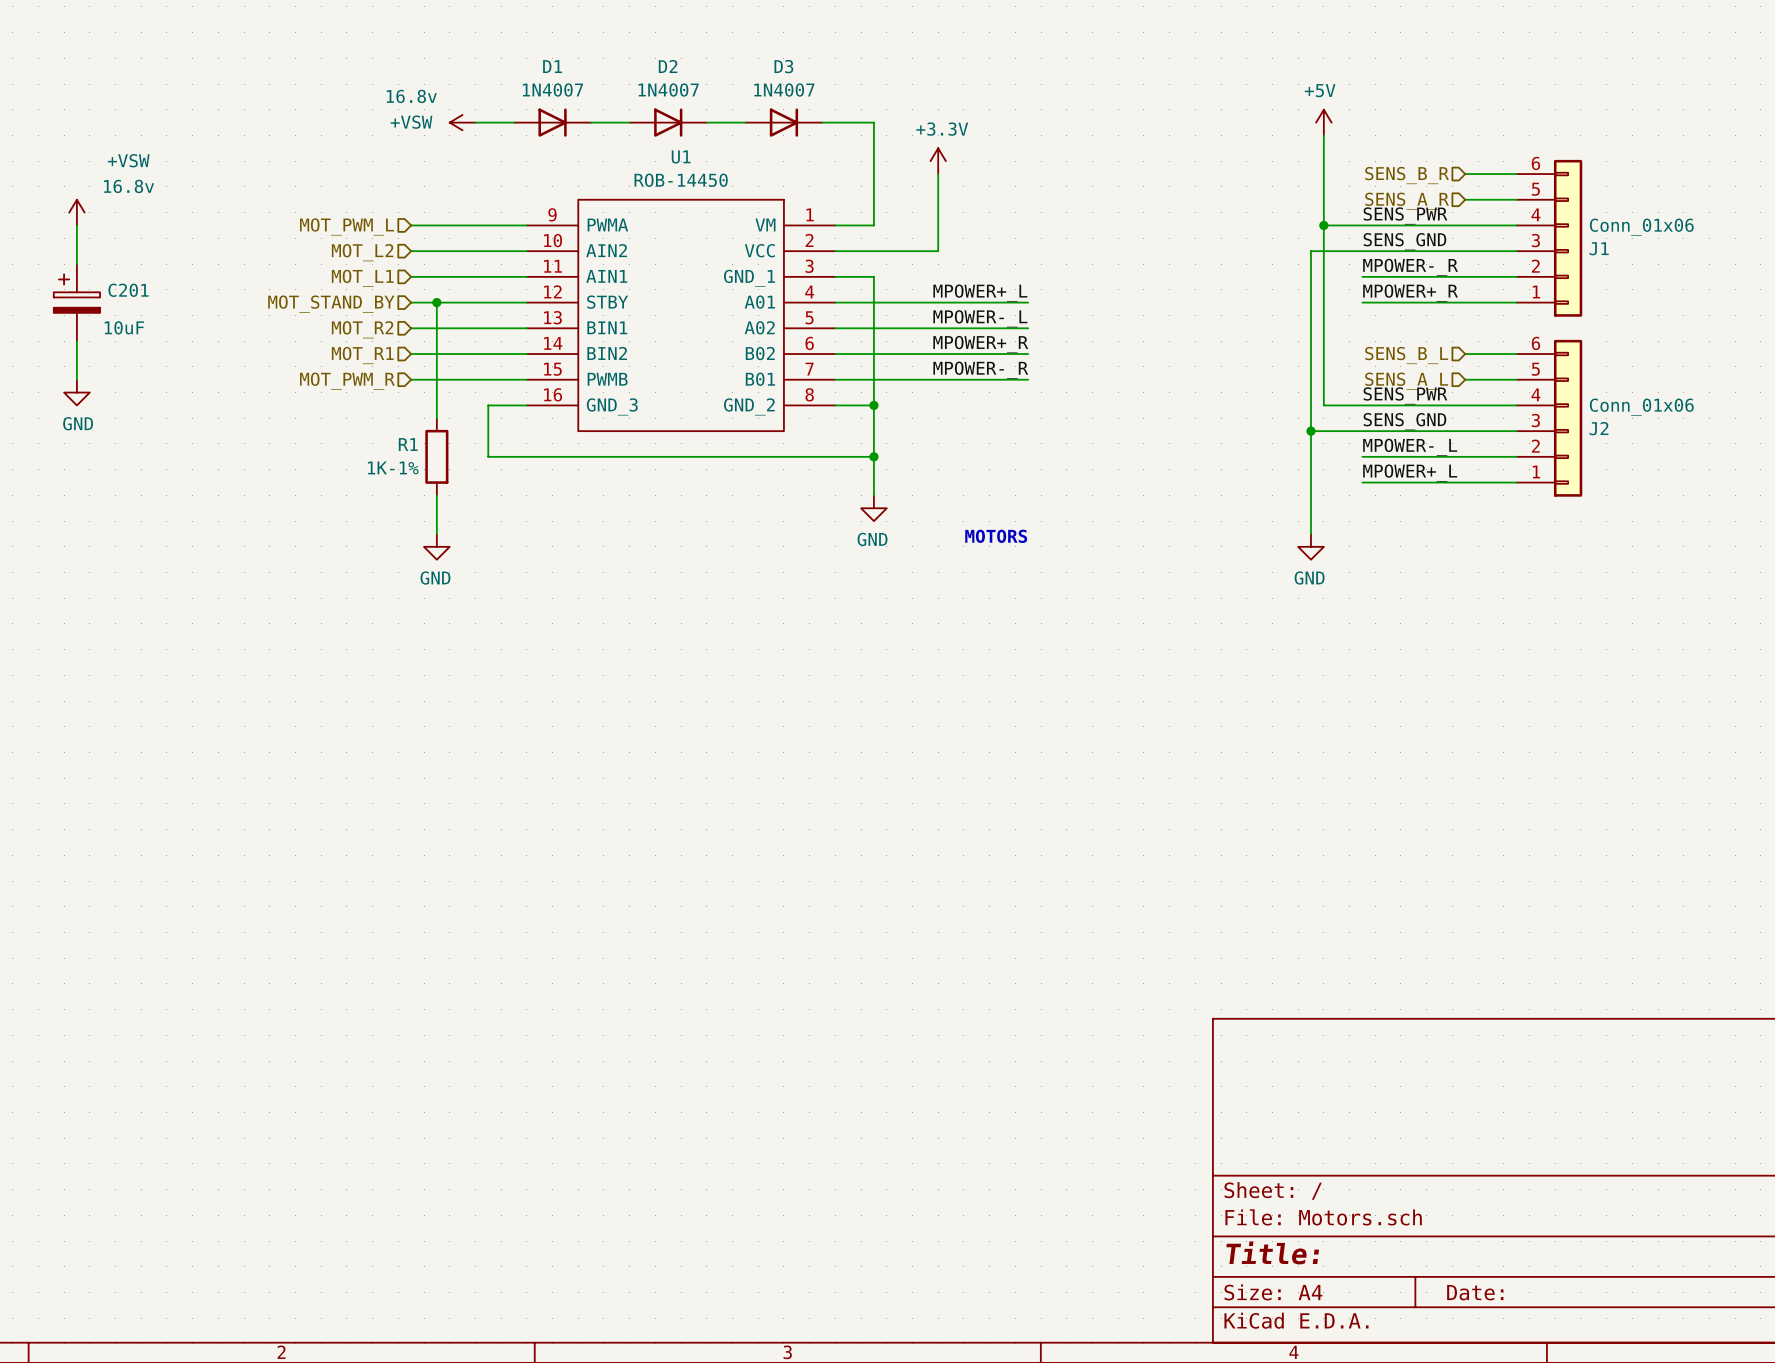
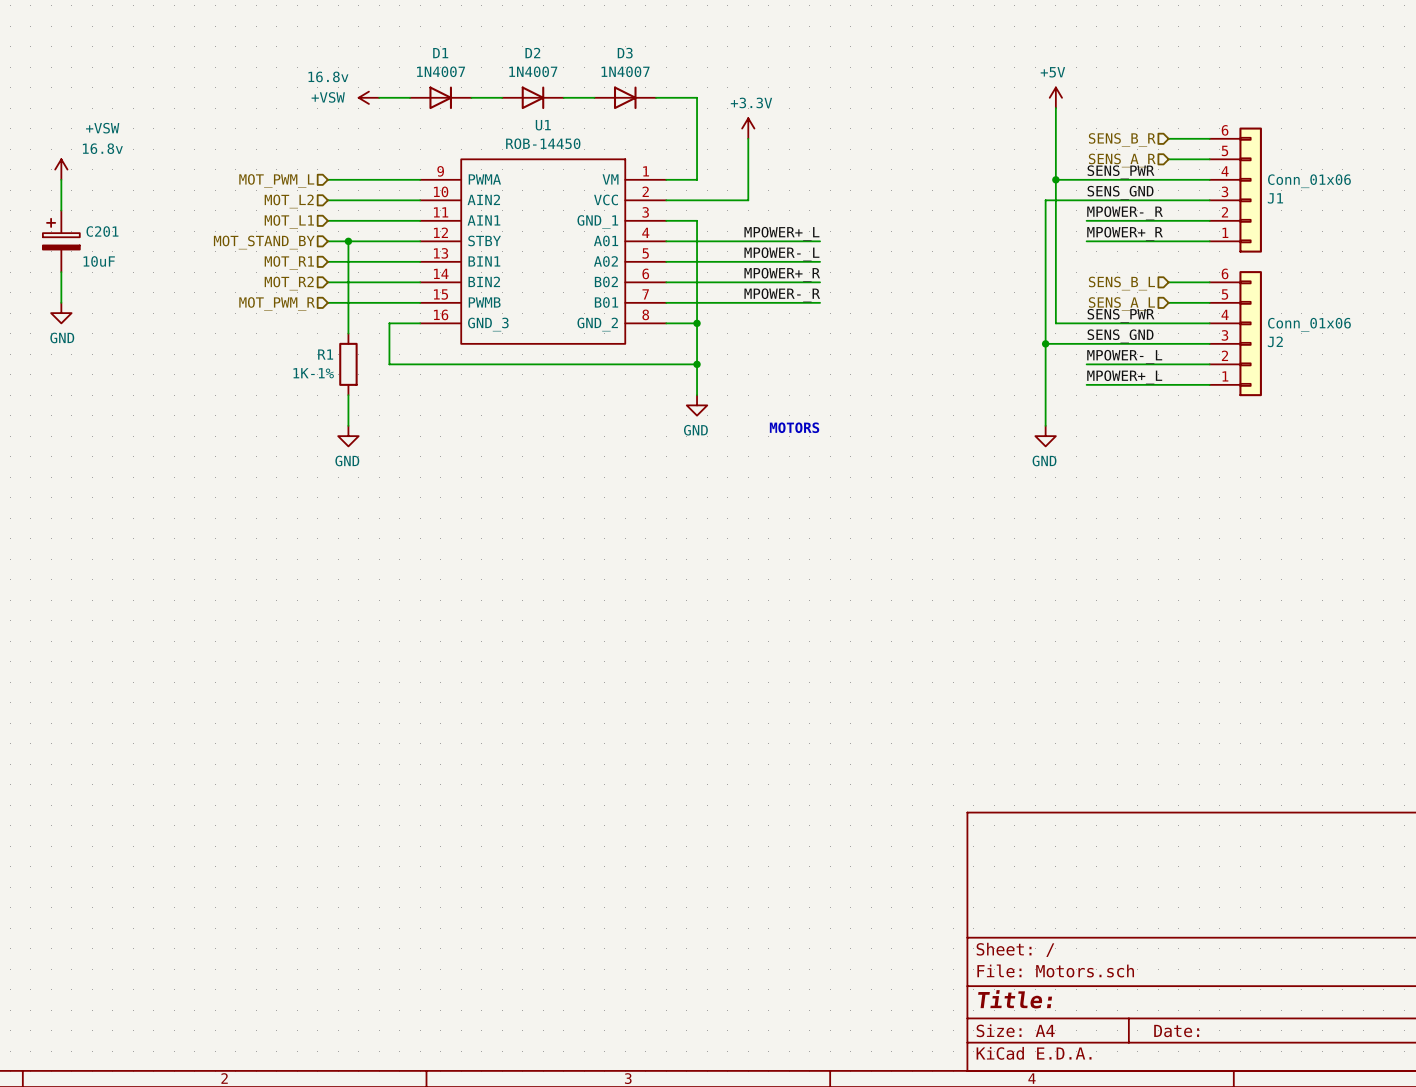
hierarchical label: MOT_R2 (362, 329) -> MOT_R1 (289, 263)
hierarchical label: MOT_R1 (362, 355) -> MOT_R2 (289, 283)

